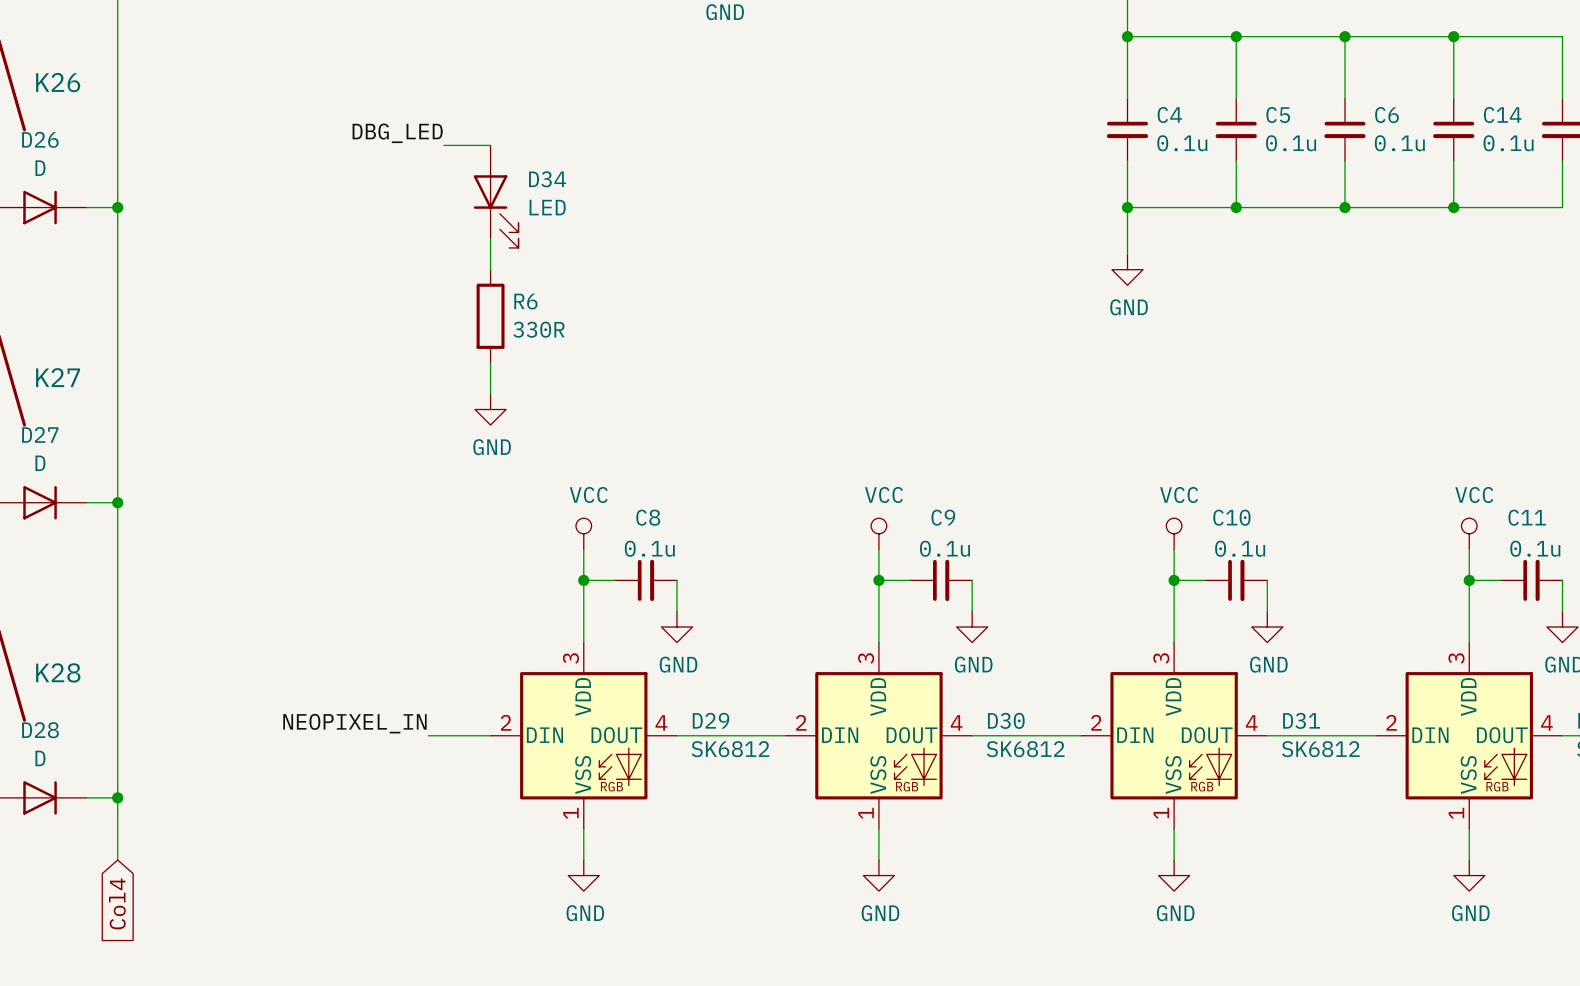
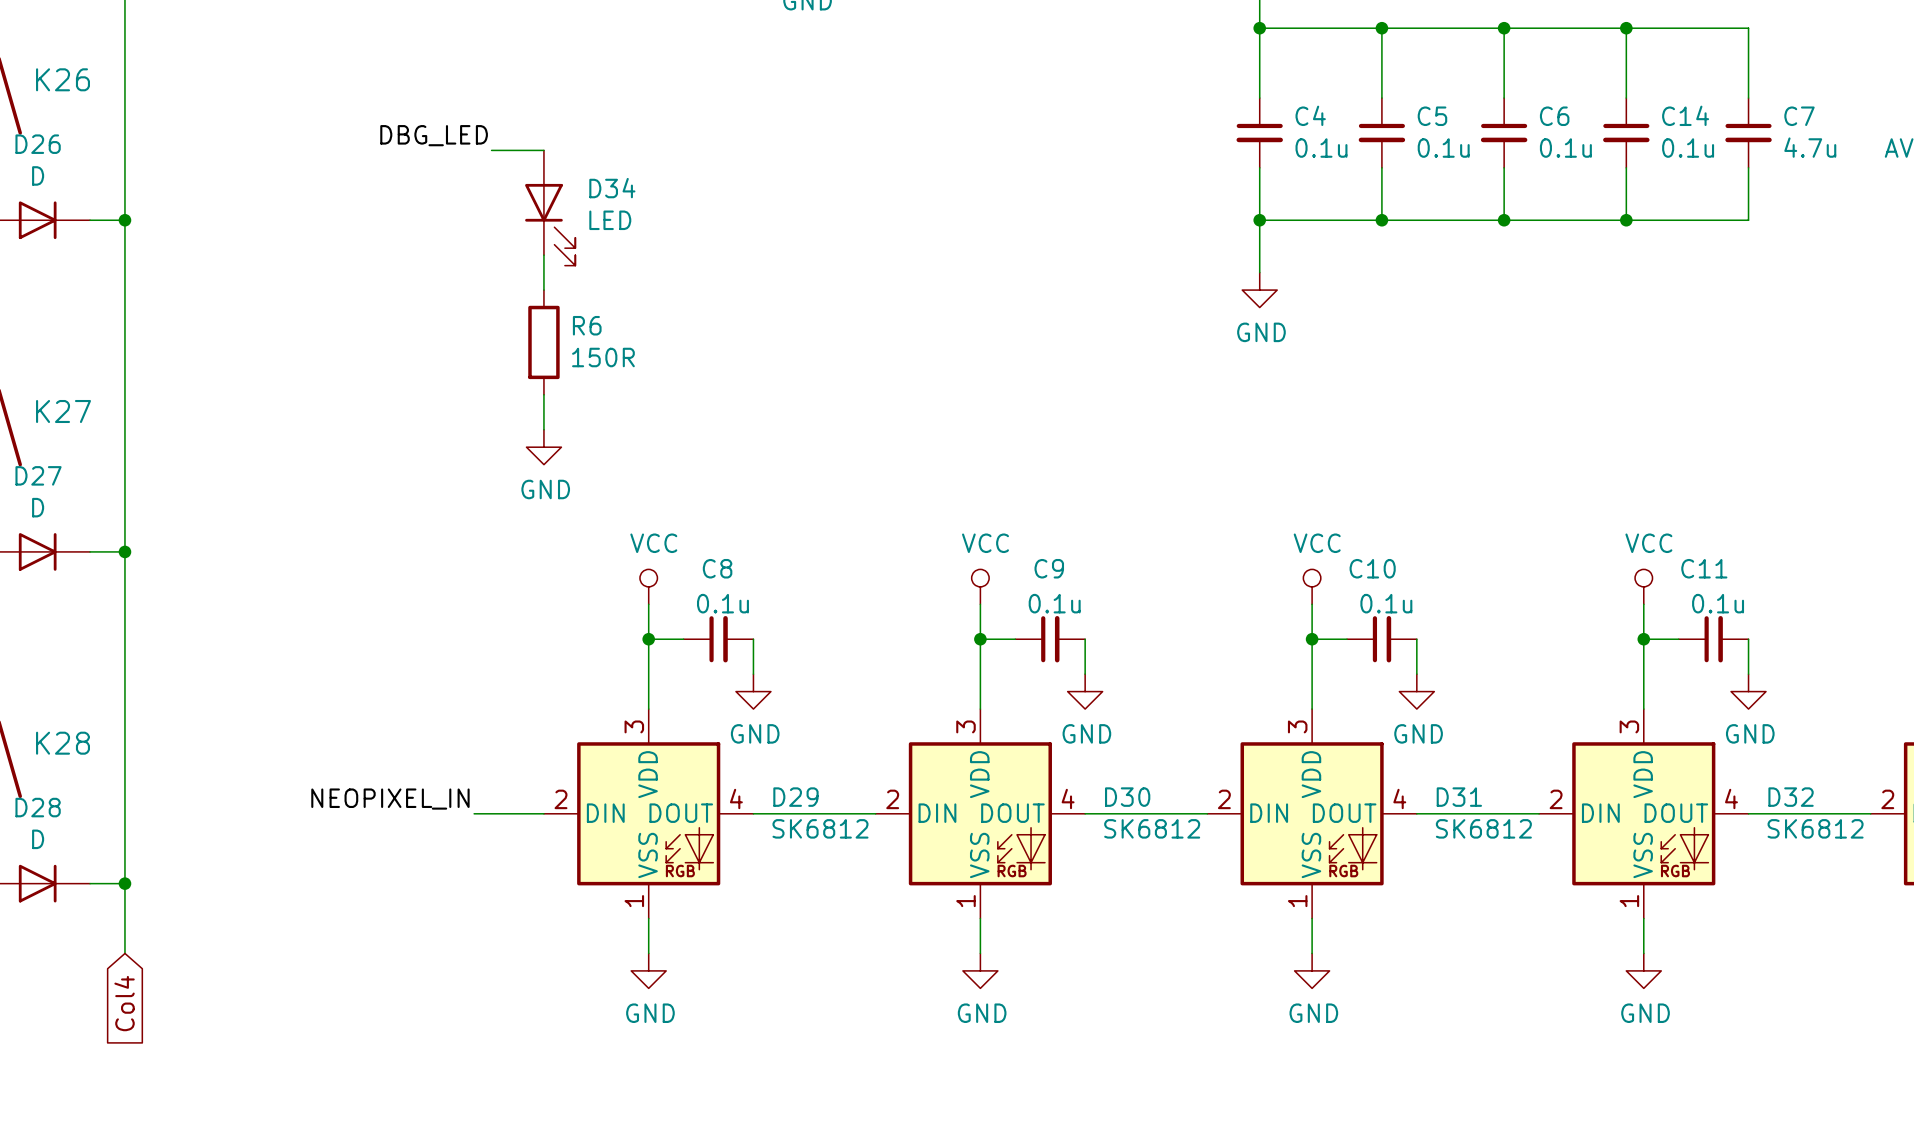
R6 value: 330R (538, 329) -> 150R (603, 357)

